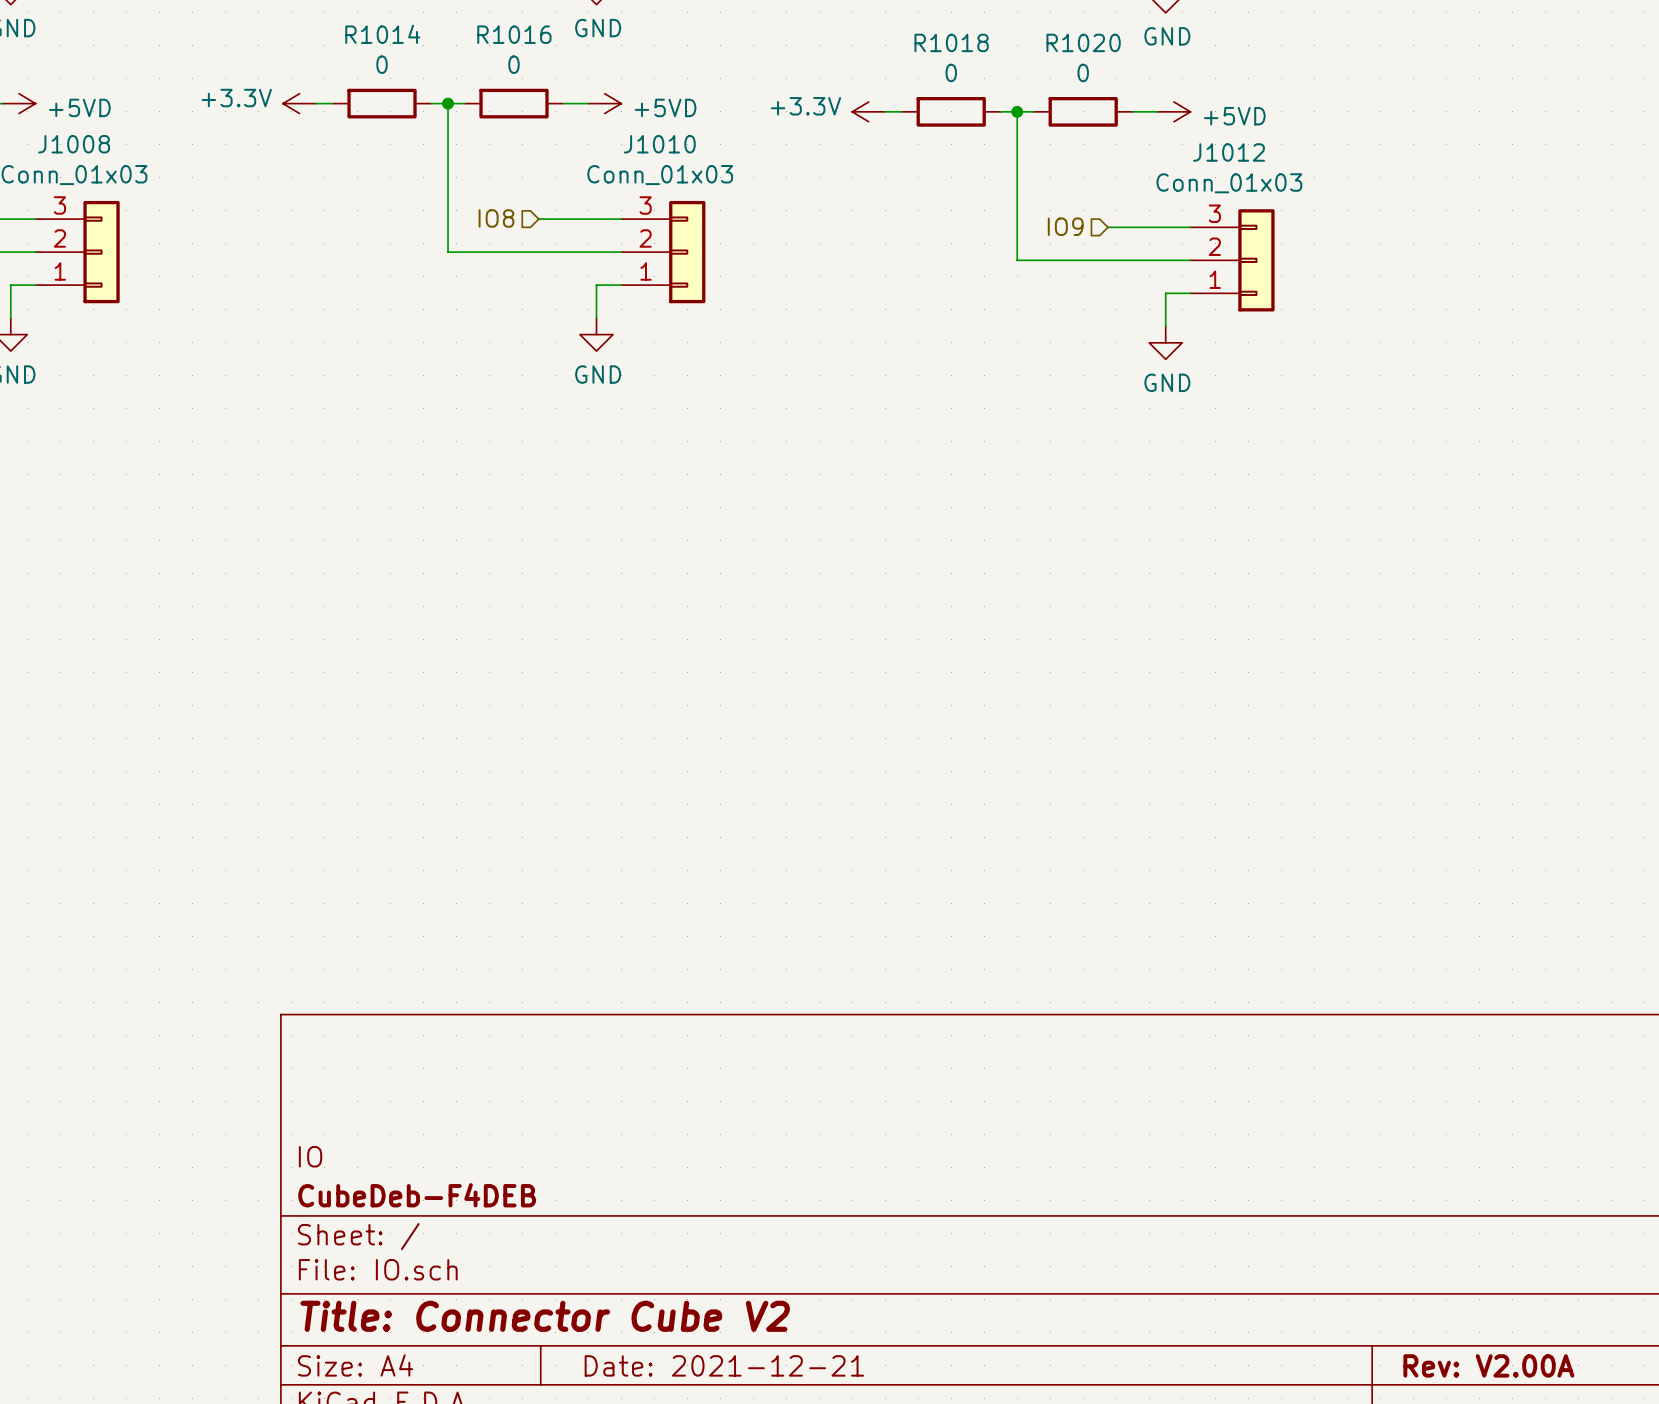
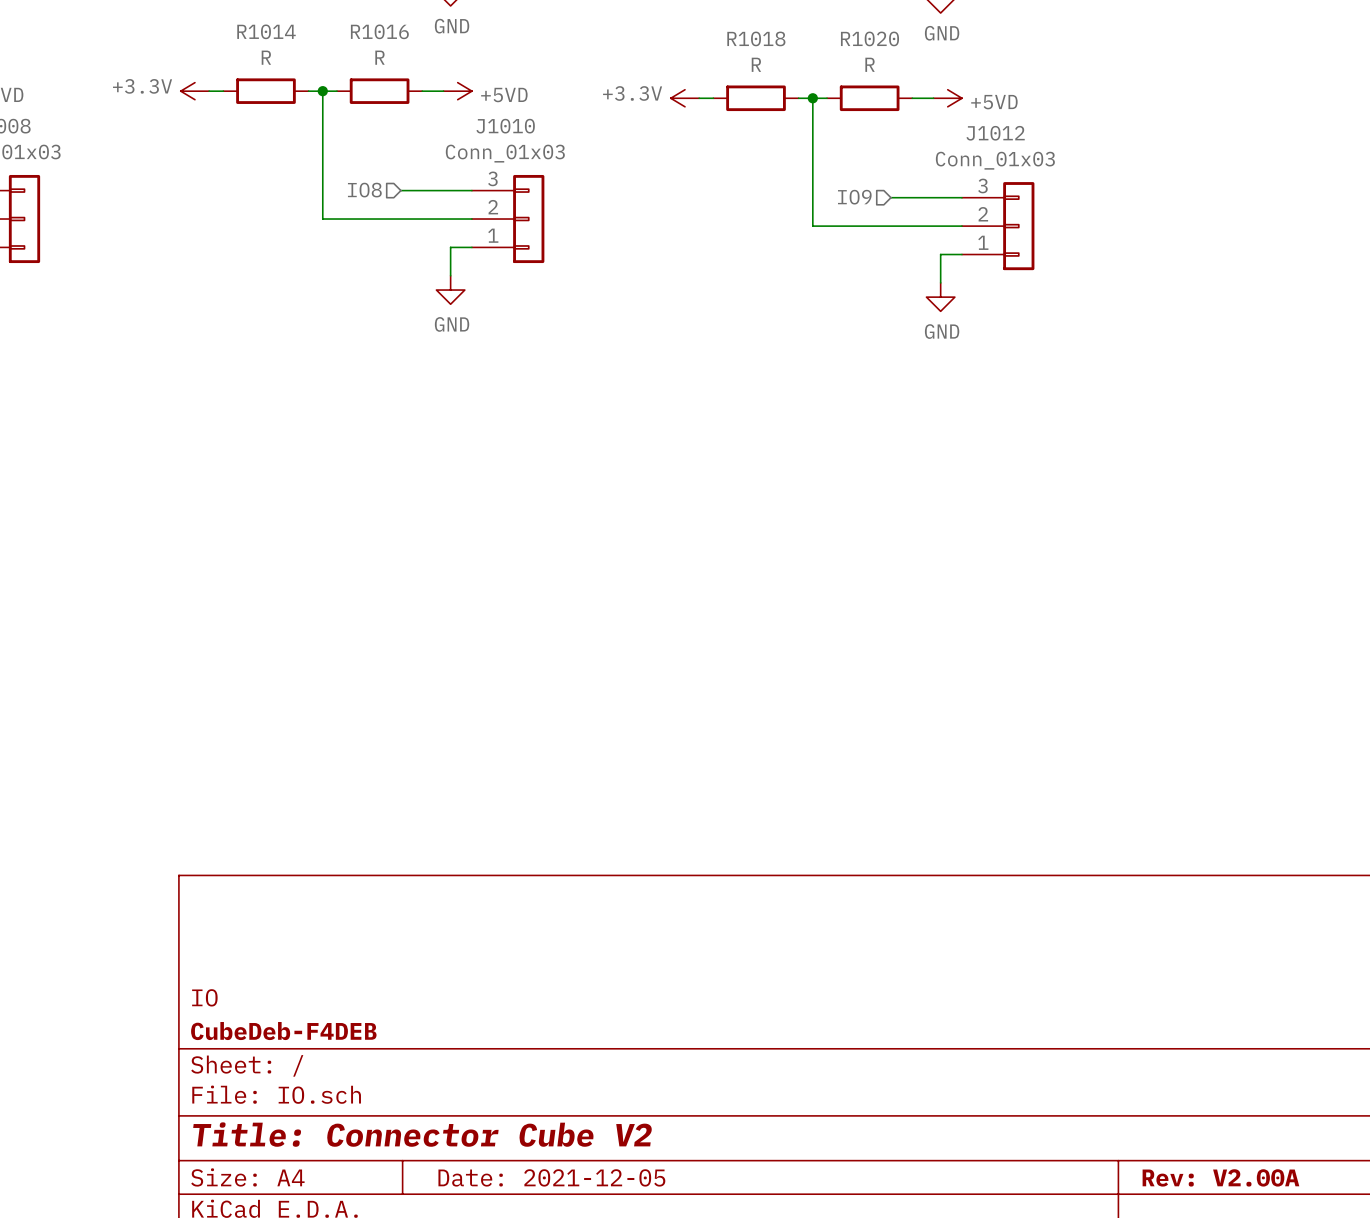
R1014 value: 0 (382, 64) -> R (266, 57)
R1016 value: 0 (514, 64) -> R (380, 57)
R1018 value: 0 (951, 72) -> R (756, 64)
R1020 value: 0 (1083, 72) -> R (870, 64)
title block: Date: 2021-12-21 (724, 1365) -> Date: 2021-12-05 (551, 1177)

